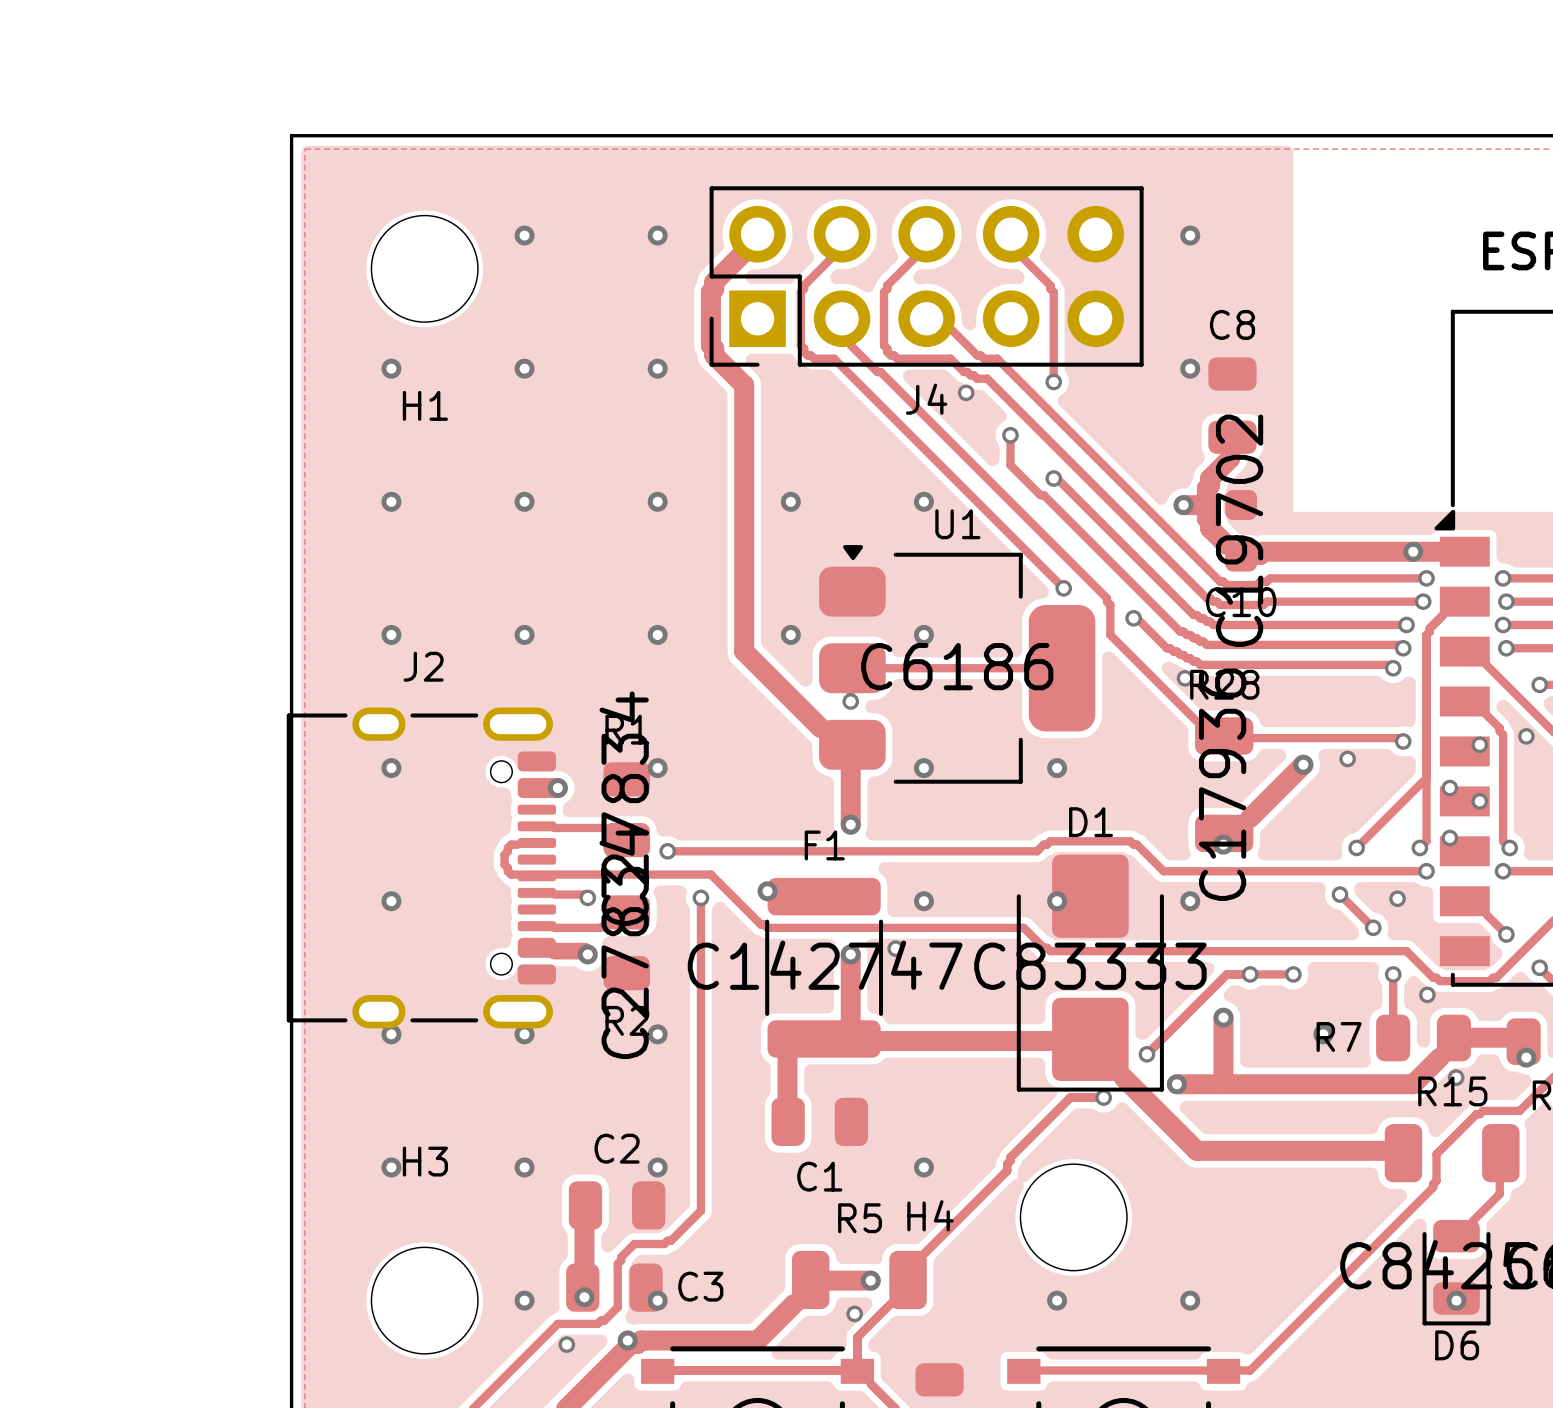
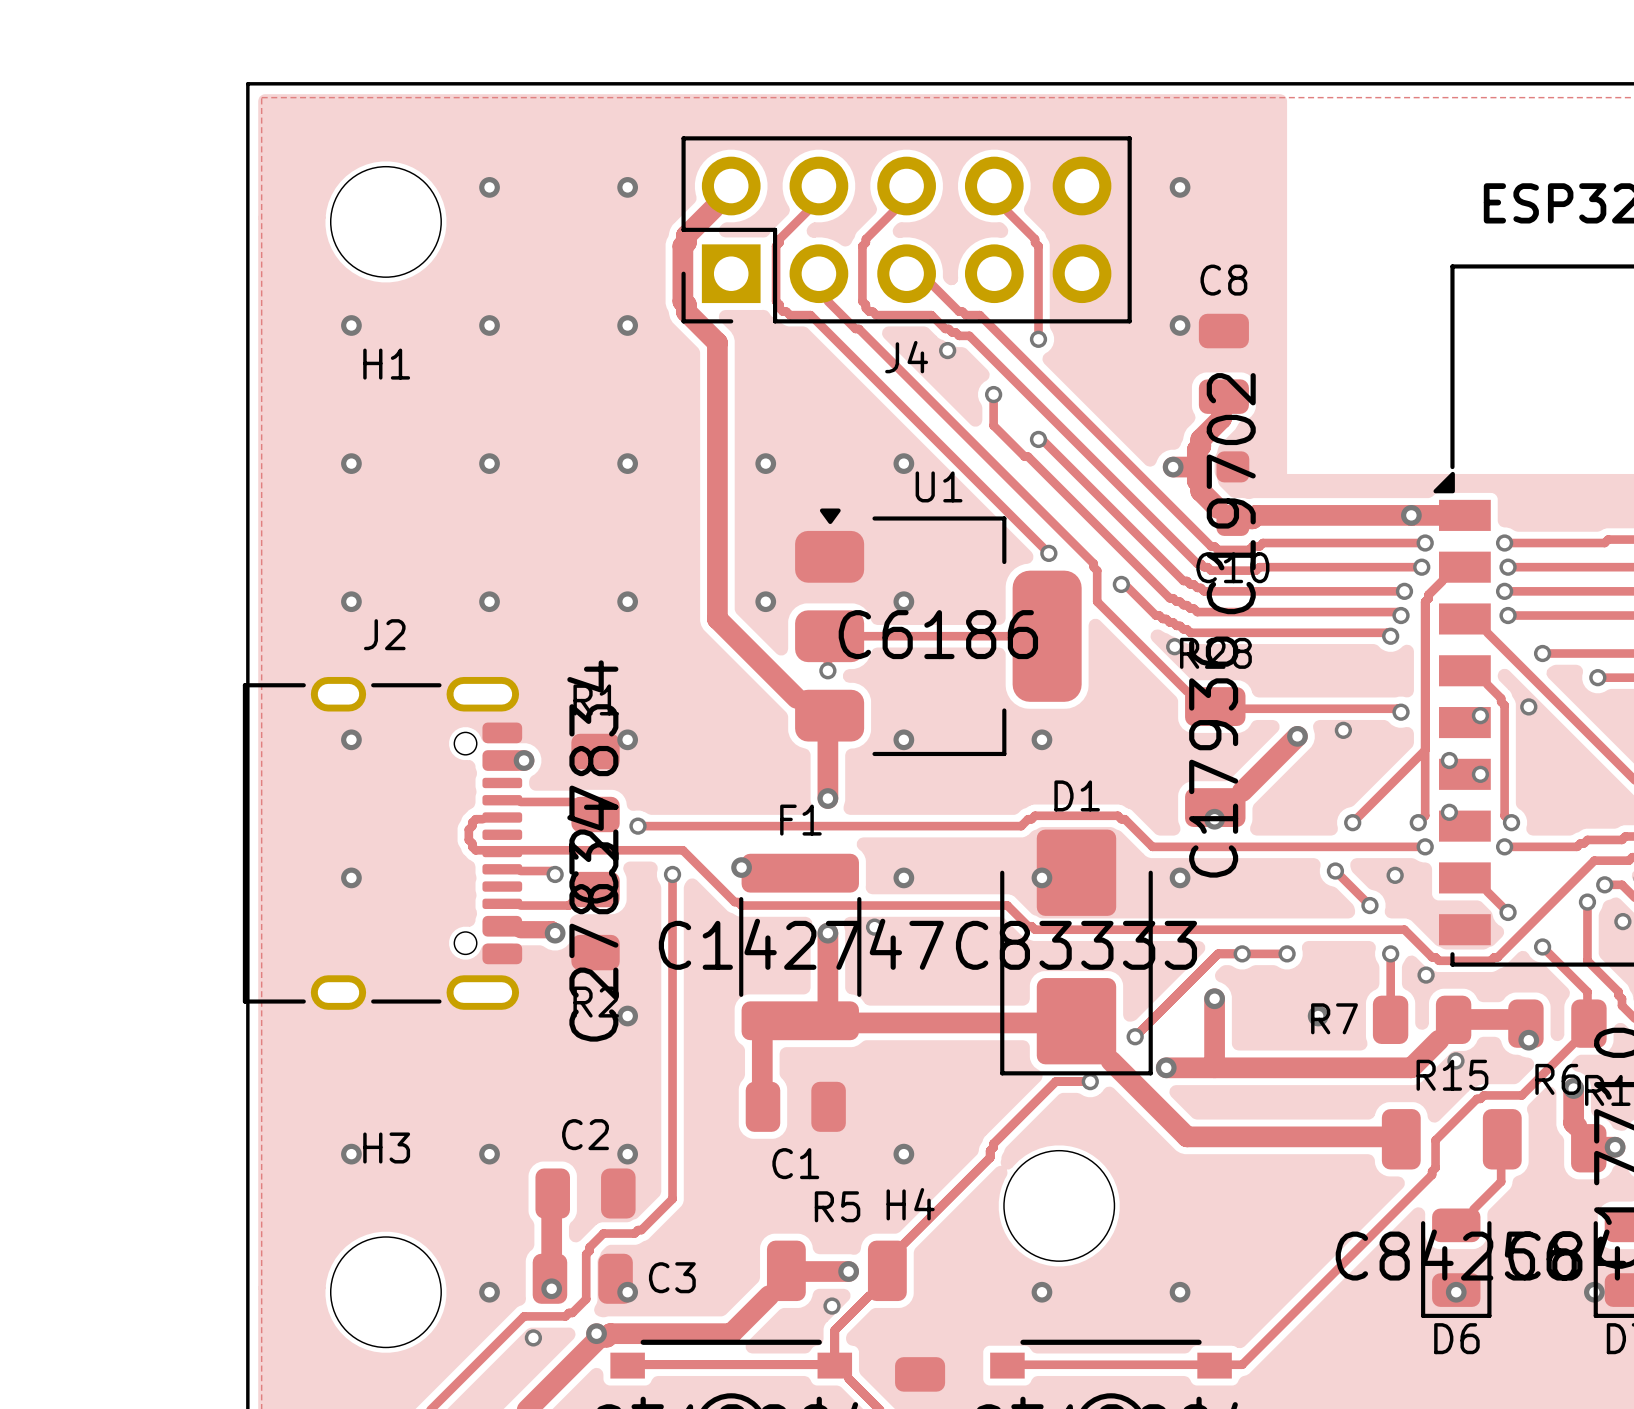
via: (391, 1034) -> none
via: (524, 1034) -> none

